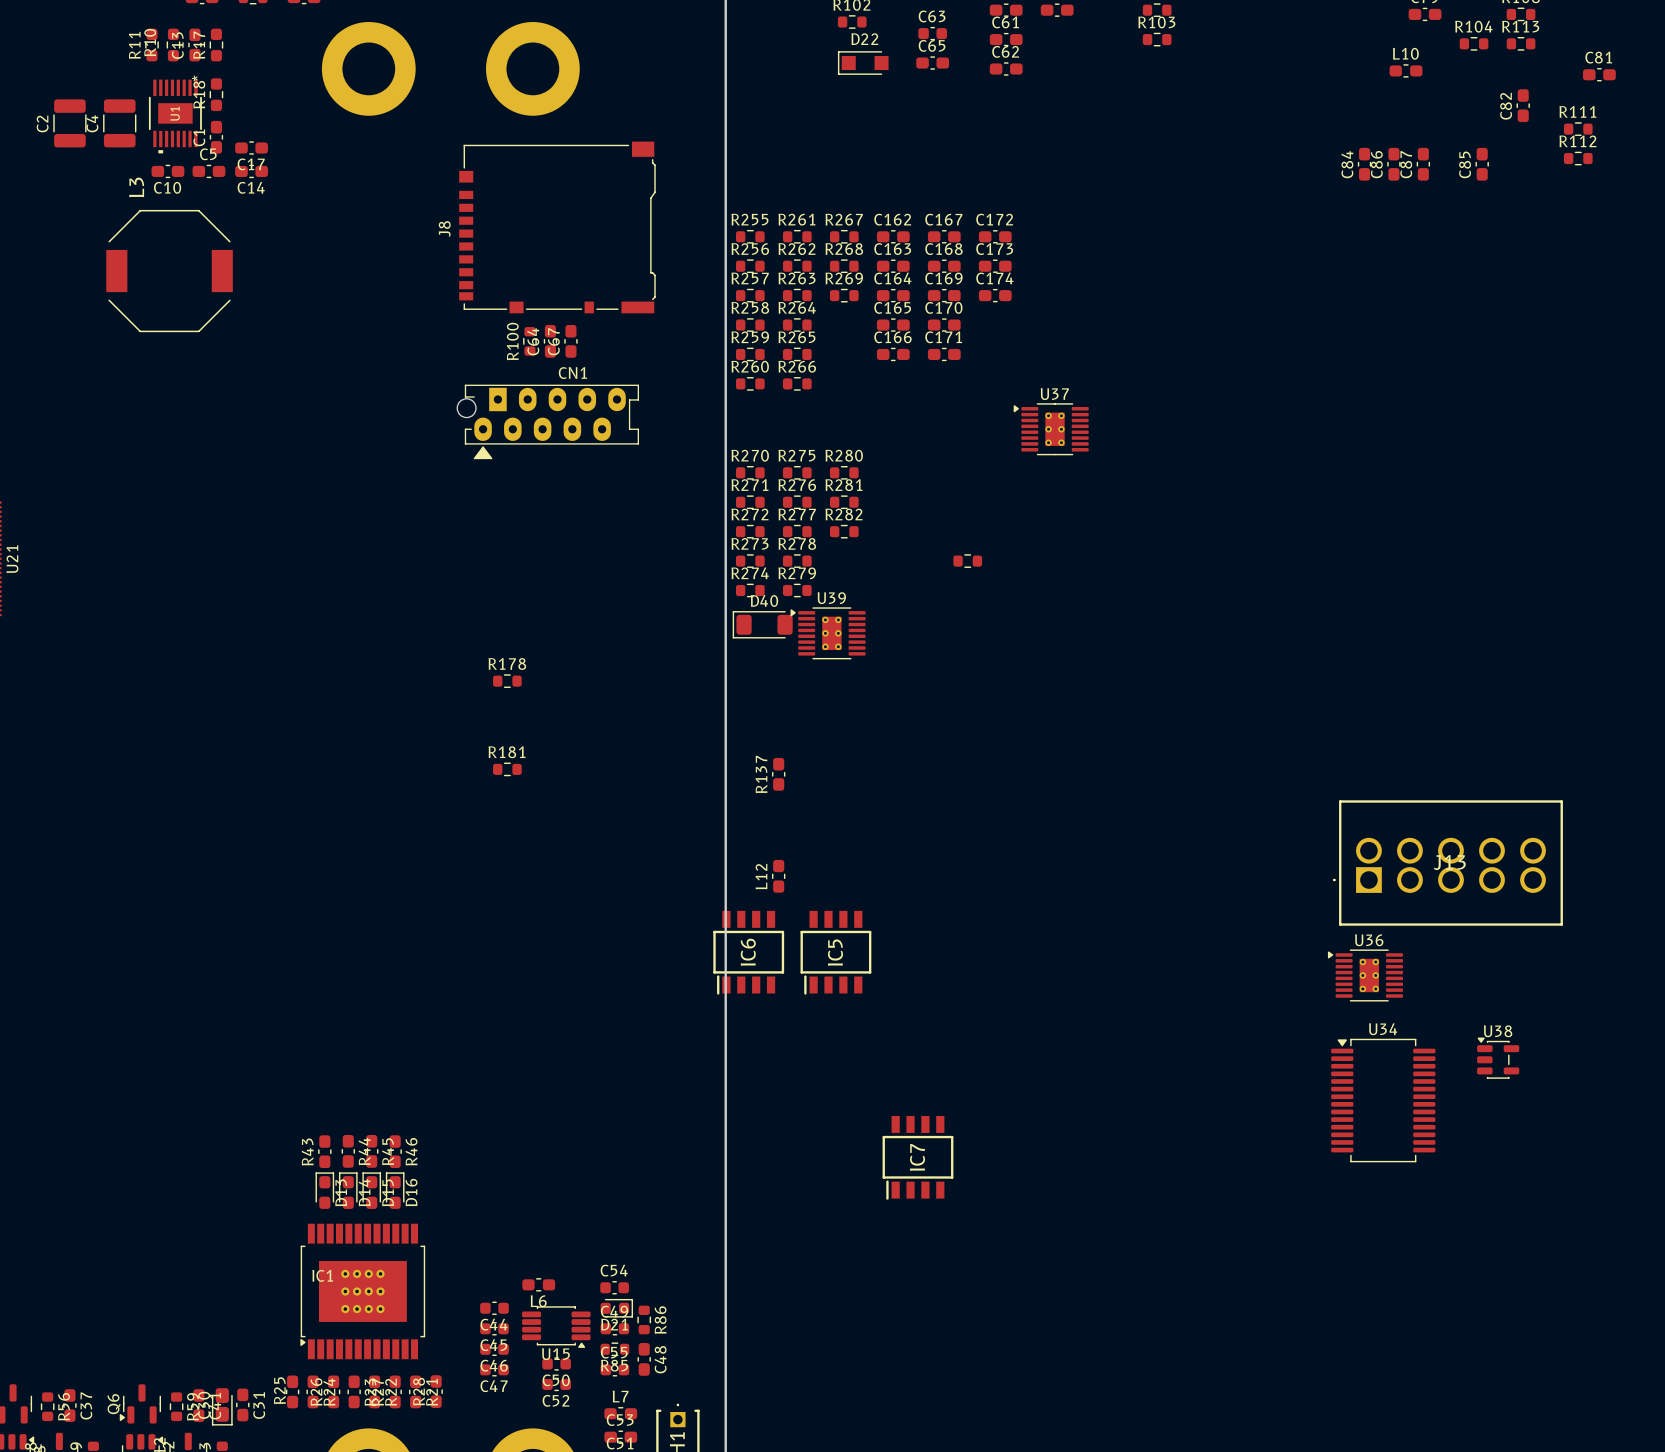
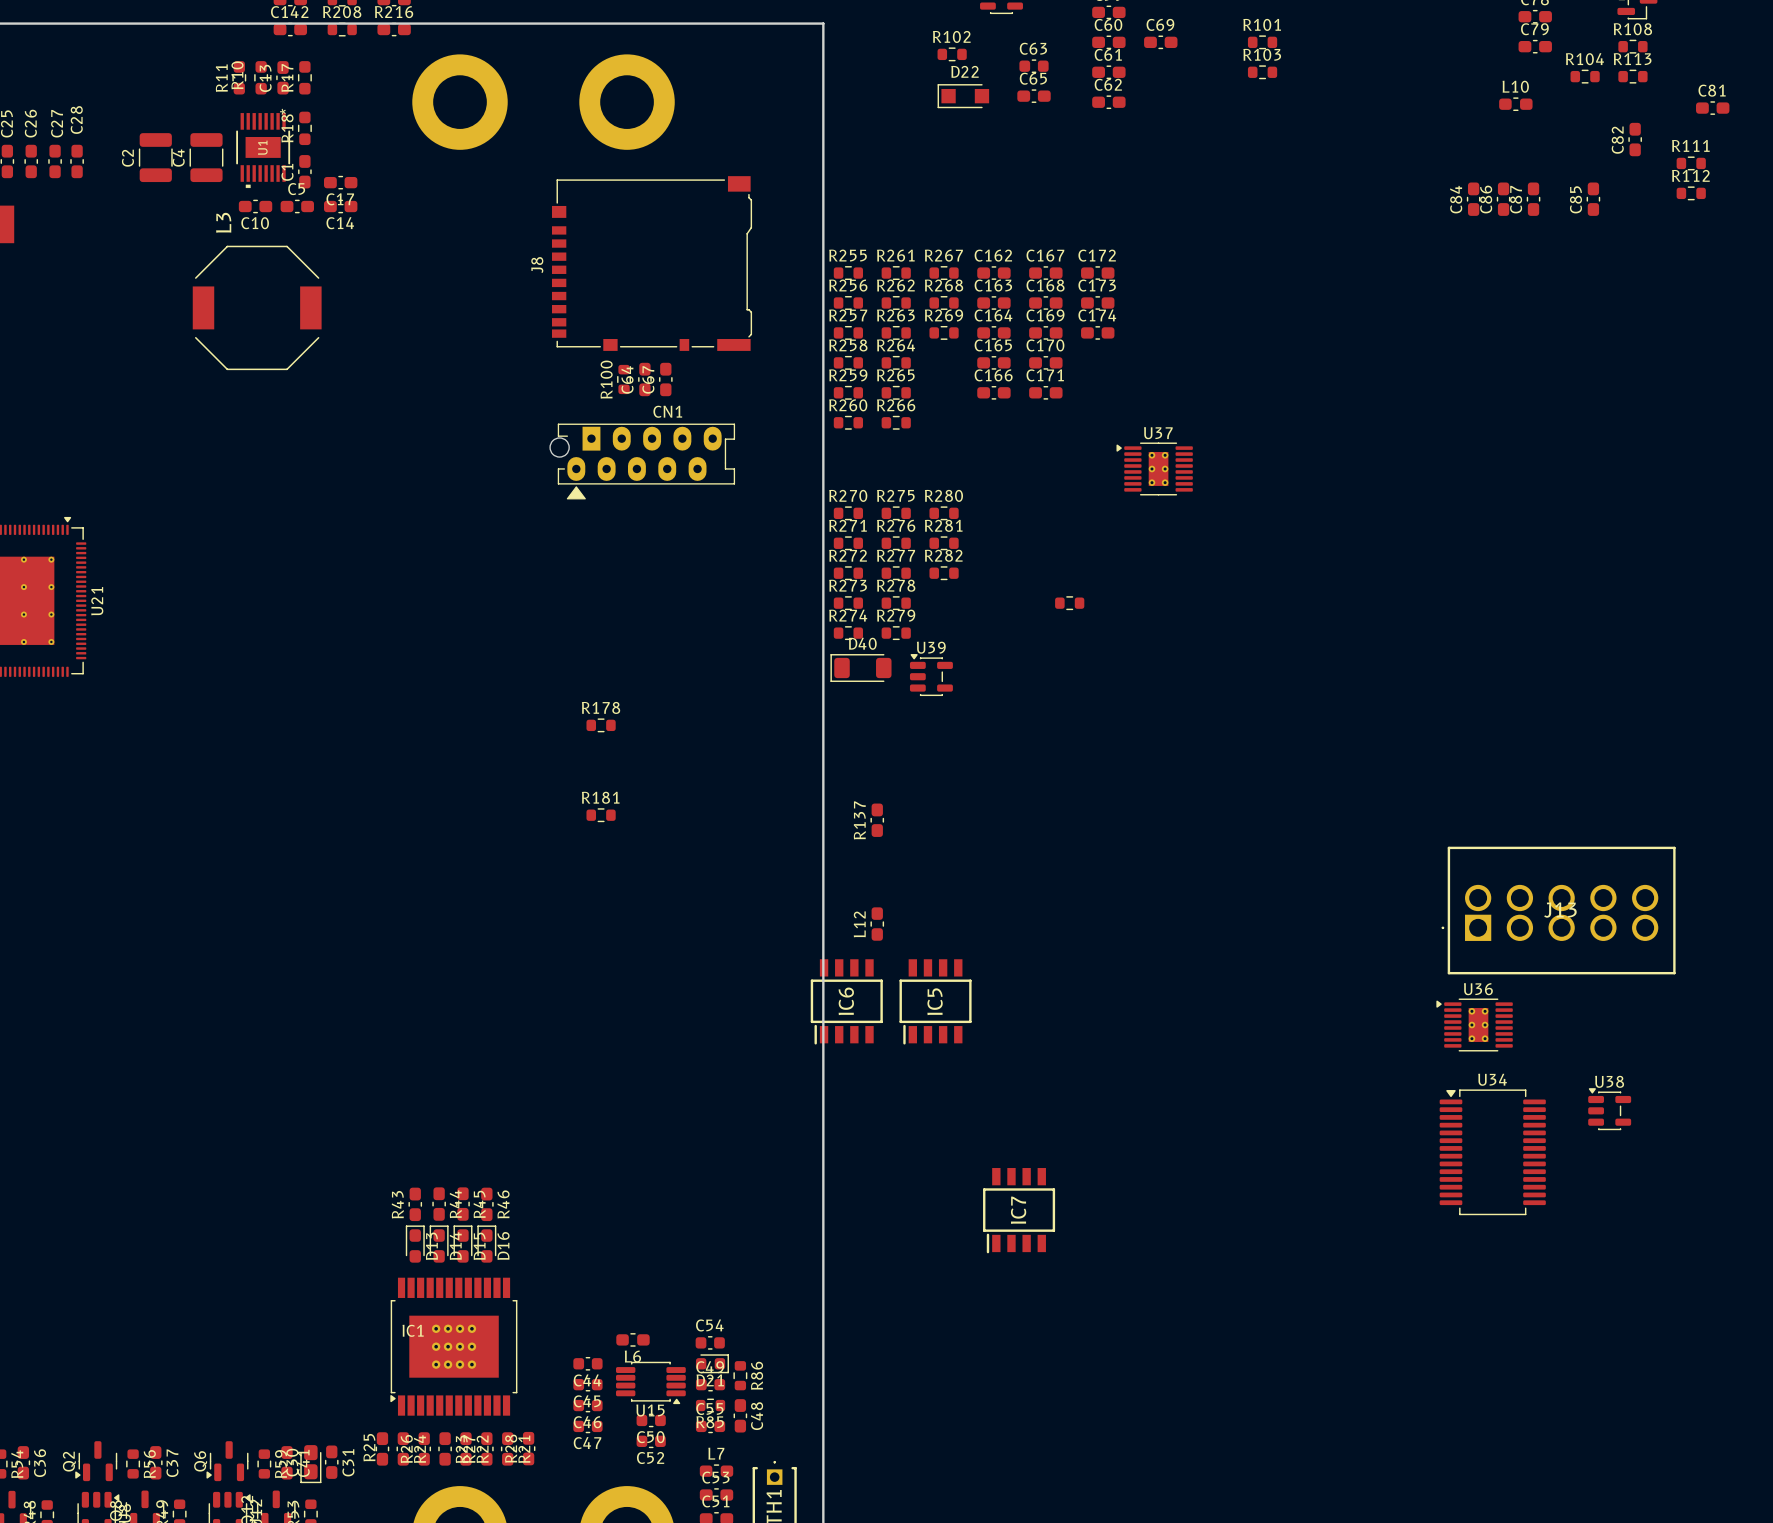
U39 footprint: [790, 607, 866, 660] -> [909, 654, 953, 697]

